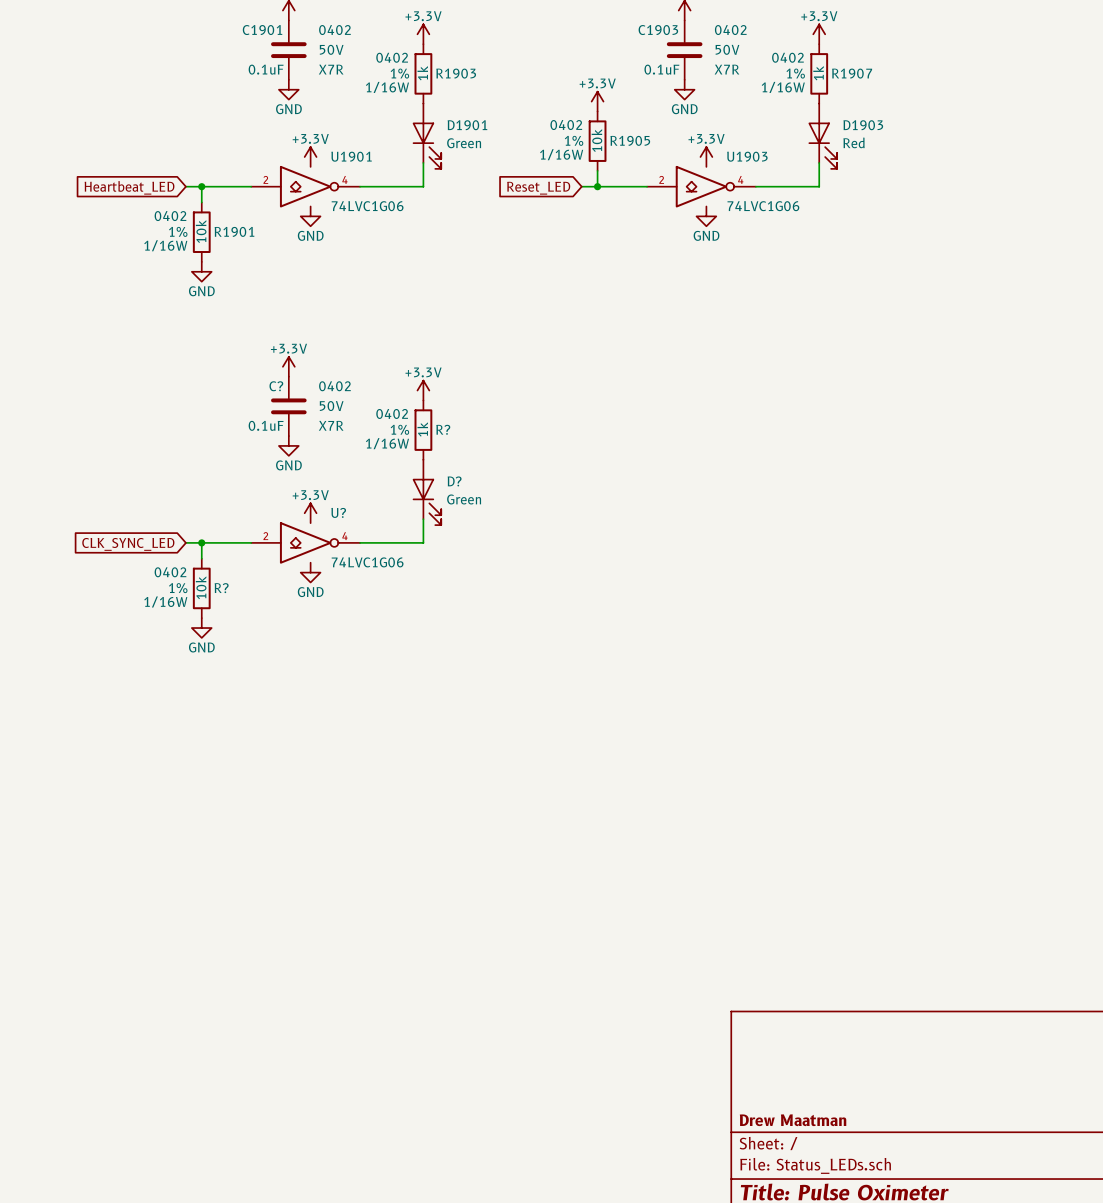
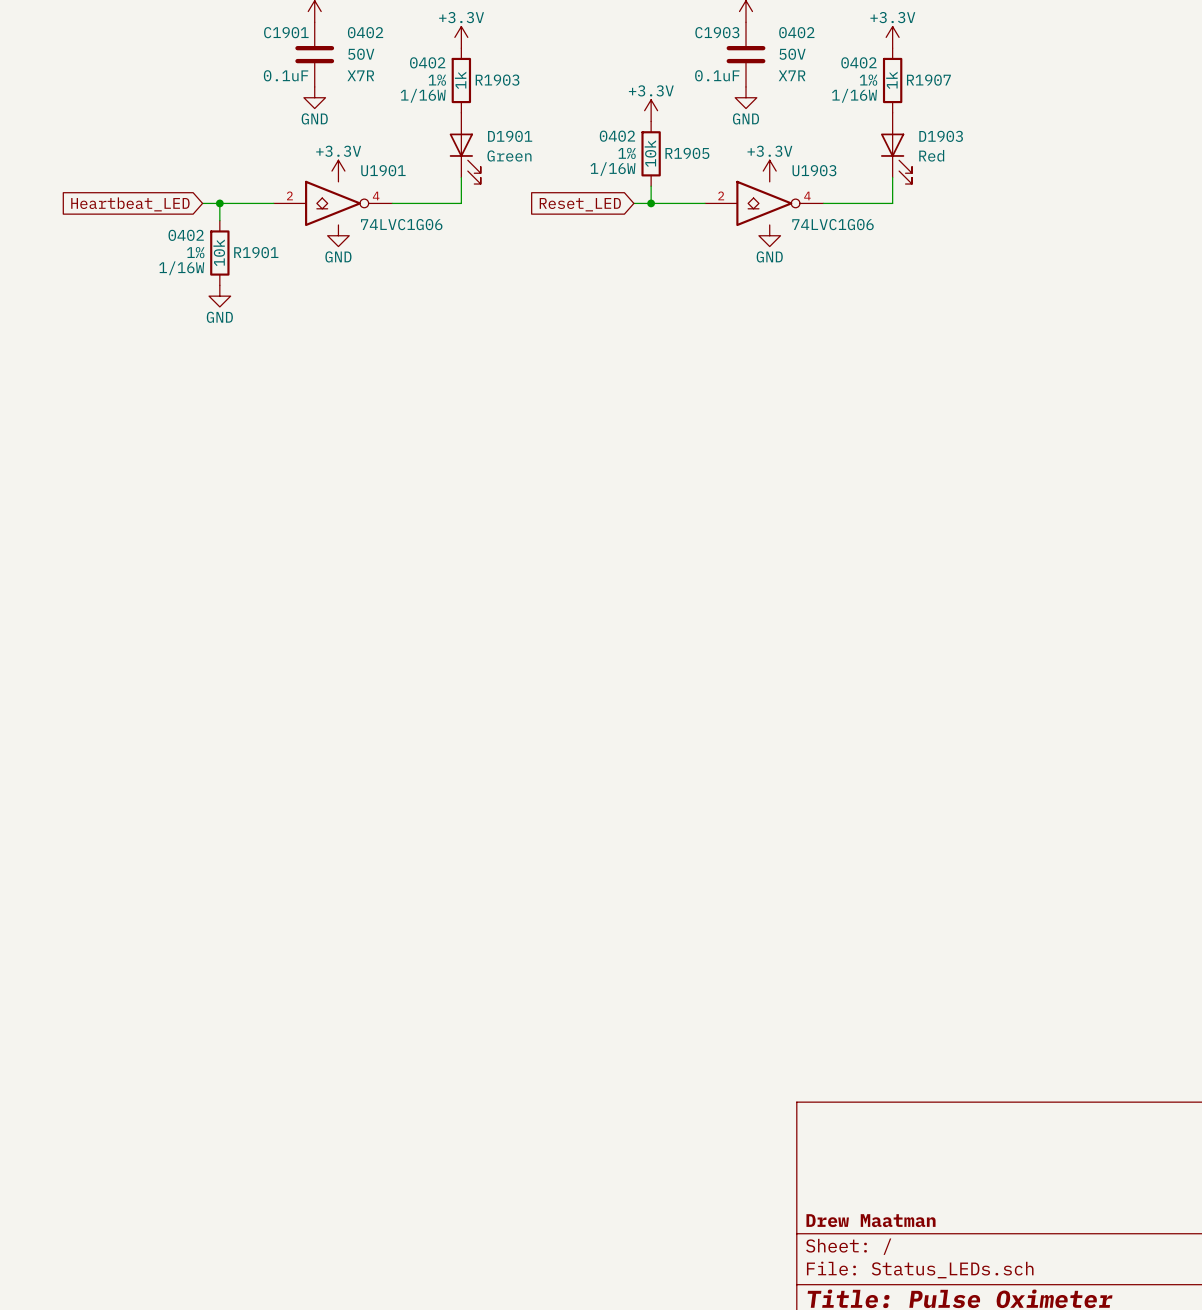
power symbol: +3.3V (288, 366) -> none
power symbol: +3.3V (423, 390) -> none
C?: 0.1uF (288, 406) -> none
R?: 1k (423, 430) -> none
power symbol: GND (288, 445) -> none
D?: Green (426, 492) -> none
power symbol: +3.3V (310, 513) -> none
wire: (423, 519) (423, 542) (360, 542) -> none
wire: (185, 542) (251, 542) -> none
wire: (201, 542) (201, 558) -> none
junction: (201, 542) -> none
U?: 74LVC1G06 (305, 542) -> none
global label: CLK_SYNC_LED (128, 544) -> none
power symbol: GND (310, 572) -> none
R?: 10k (201, 588) -> none
power symbol: GND (201, 628) -> none

